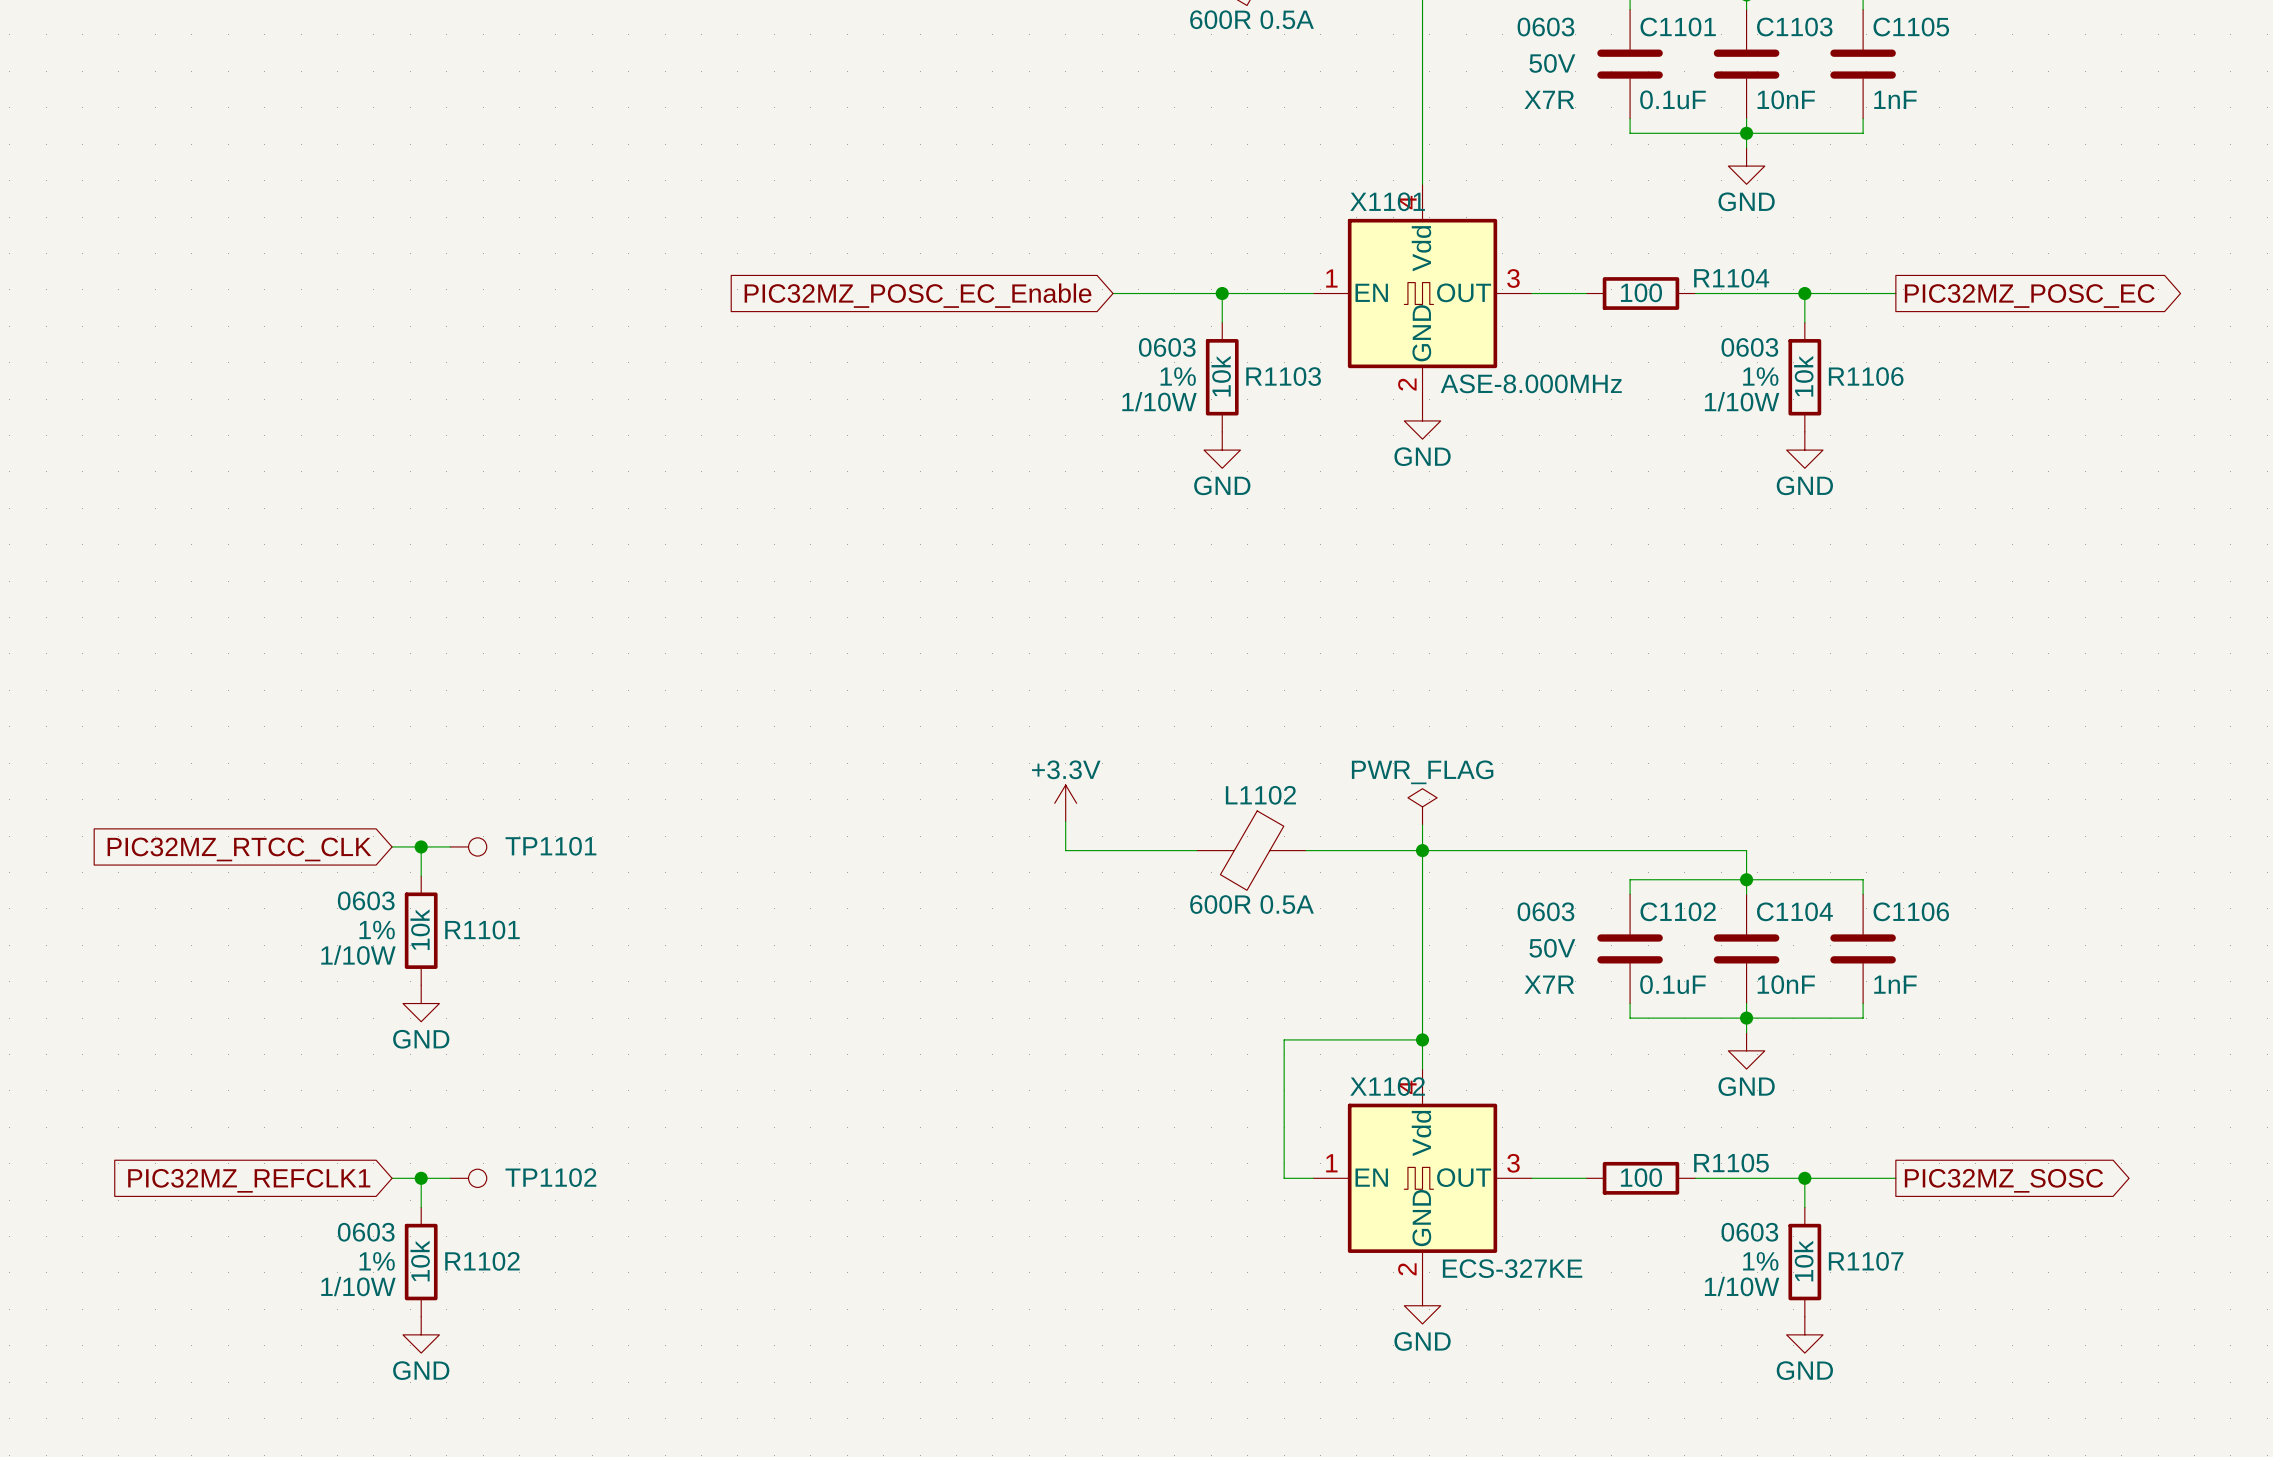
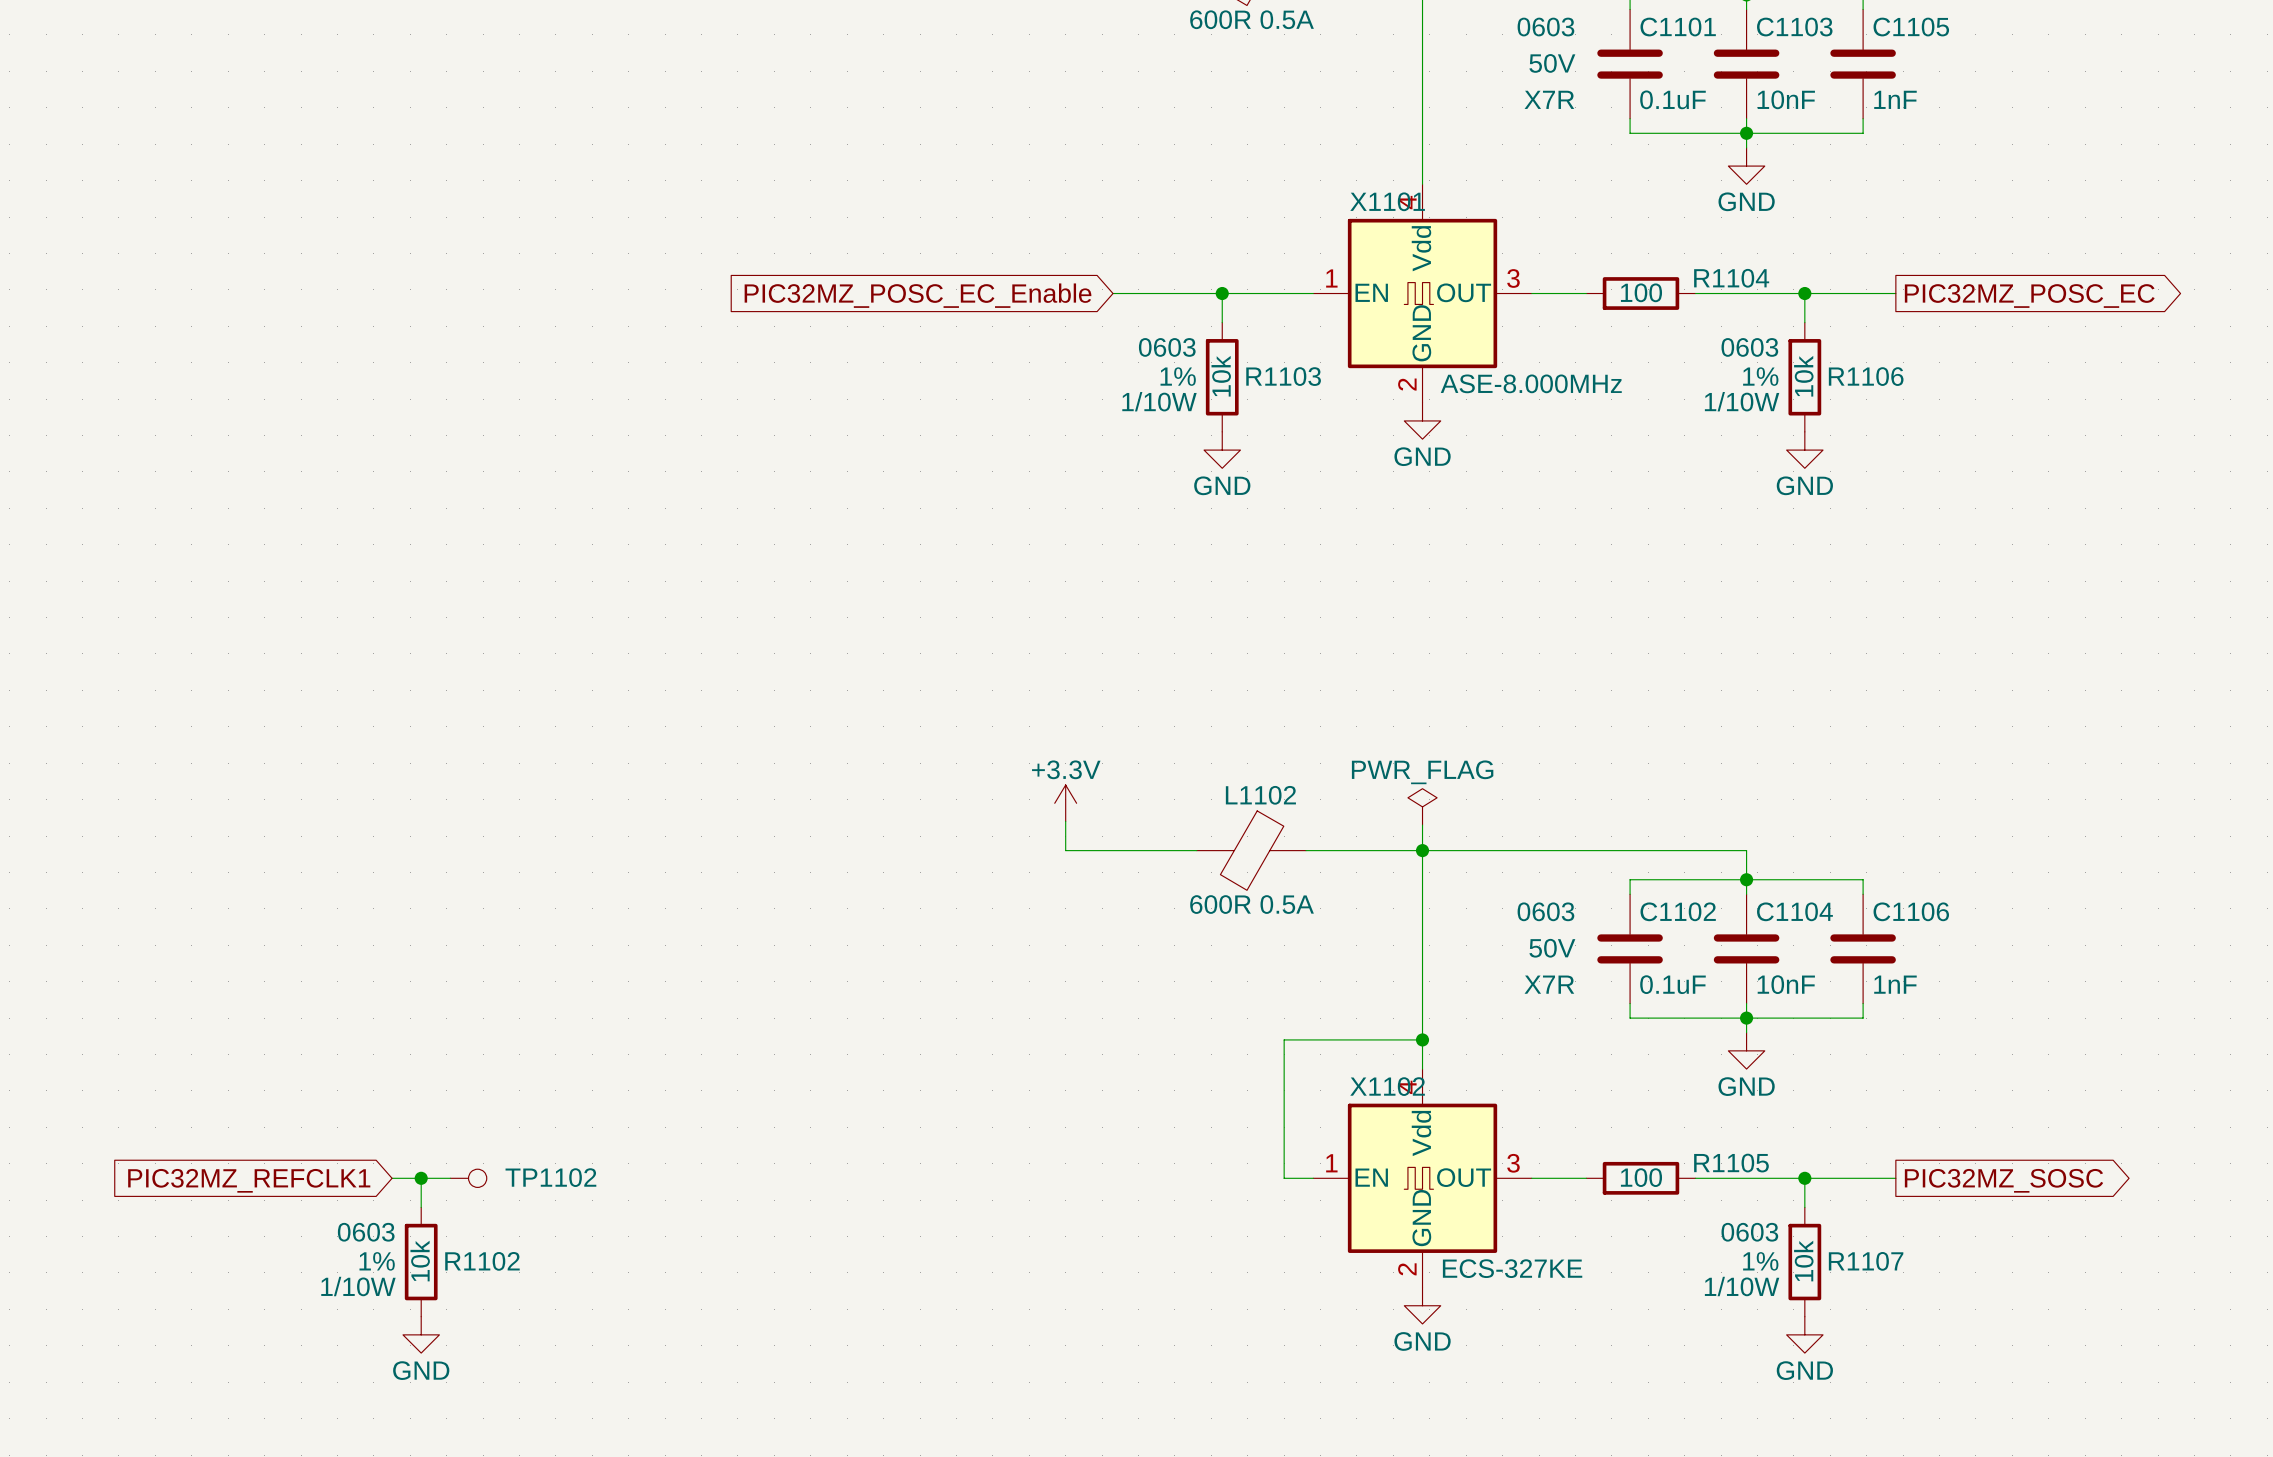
wire: (392, 846) (450, 846) -> none
wire: (421, 846) (421, 876) -> none
junction: (421, 846) -> none
TP1101: (468, 846) -> none
global label: PIC32MZ_RTCC_CLK (239, 849) -> none
R1101: 10k (421, 930) -> none
power symbol: GND (421, 1003) -> none

